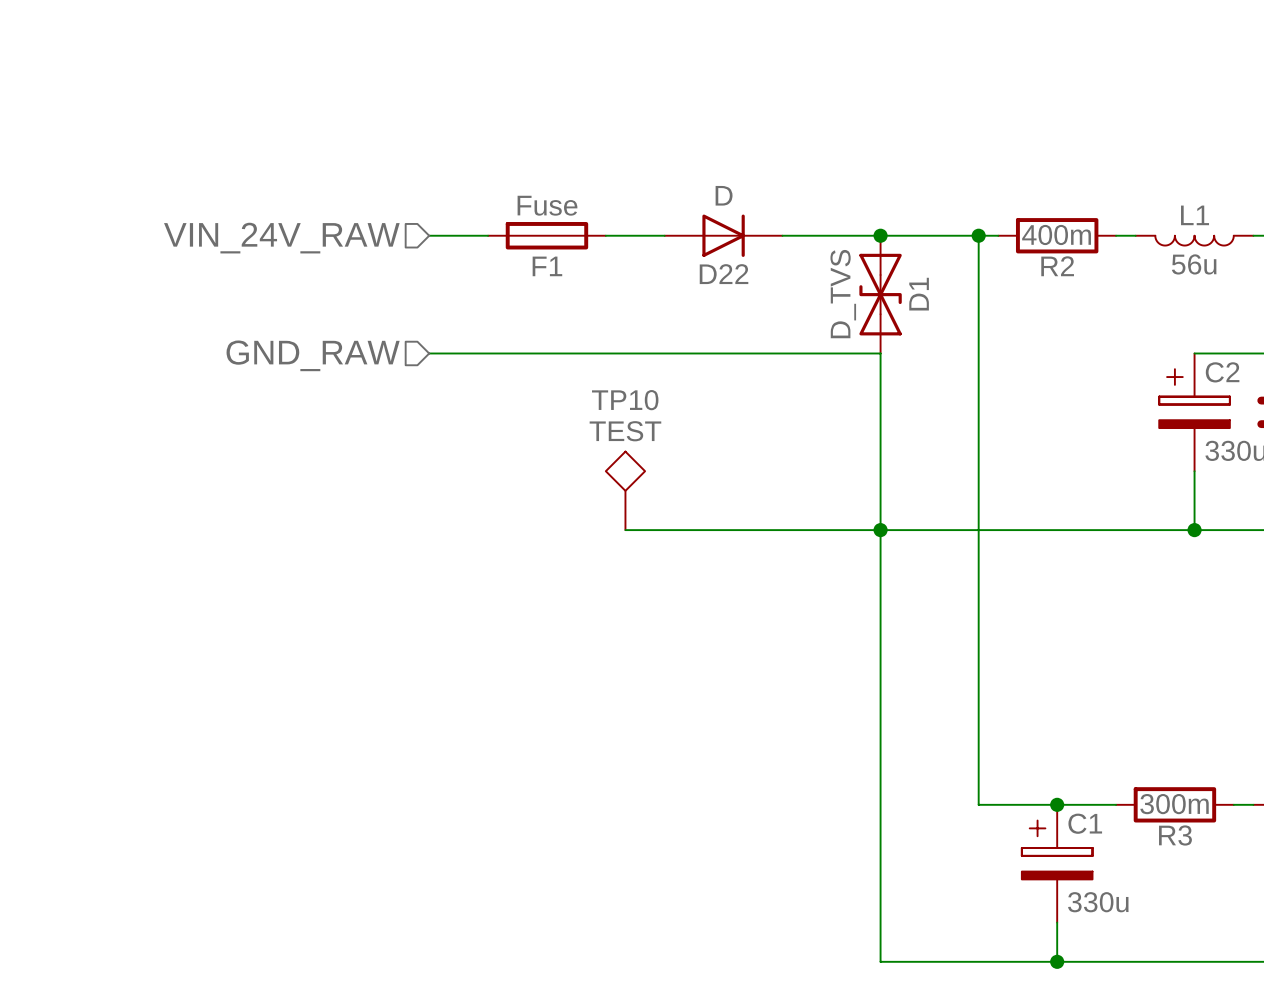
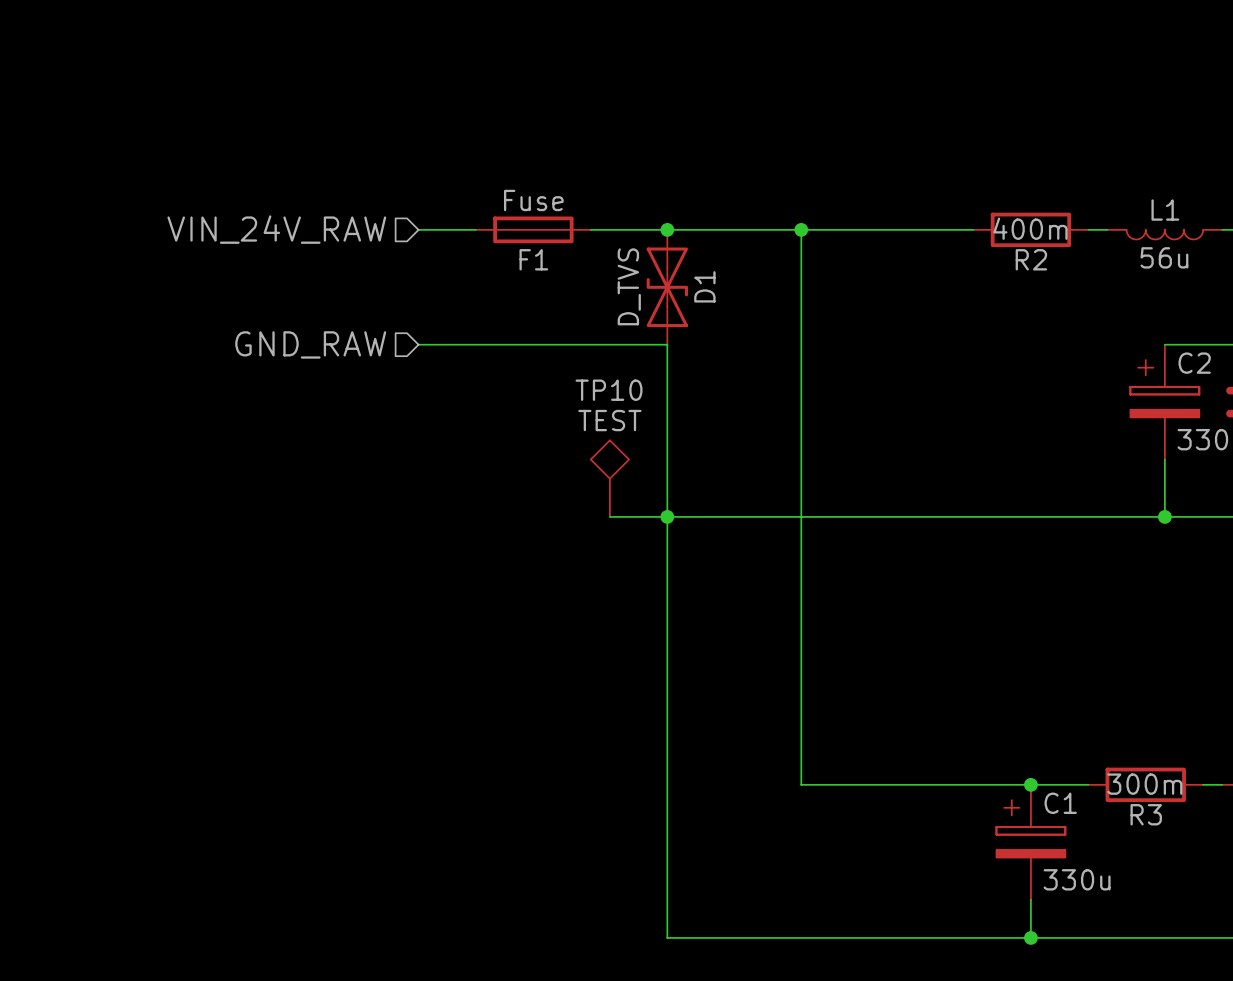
junction: none -> (667, 229)
D22: D (723, 235) -> none
junction position: (880, 235) -> (801, 229)
wire: (978, 235) (978, 804) -> (801, 229) (801, 784) (954, 784)
junction: (978, 235) -> none
D1 position: (880, 294) -> (667, 287)
wire: (684, 353) (880, 353) (880, 961) -> (667, 344) (667, 937) (858, 937)
junction: none -> (667, 516)
junction: (880, 530) -> none

